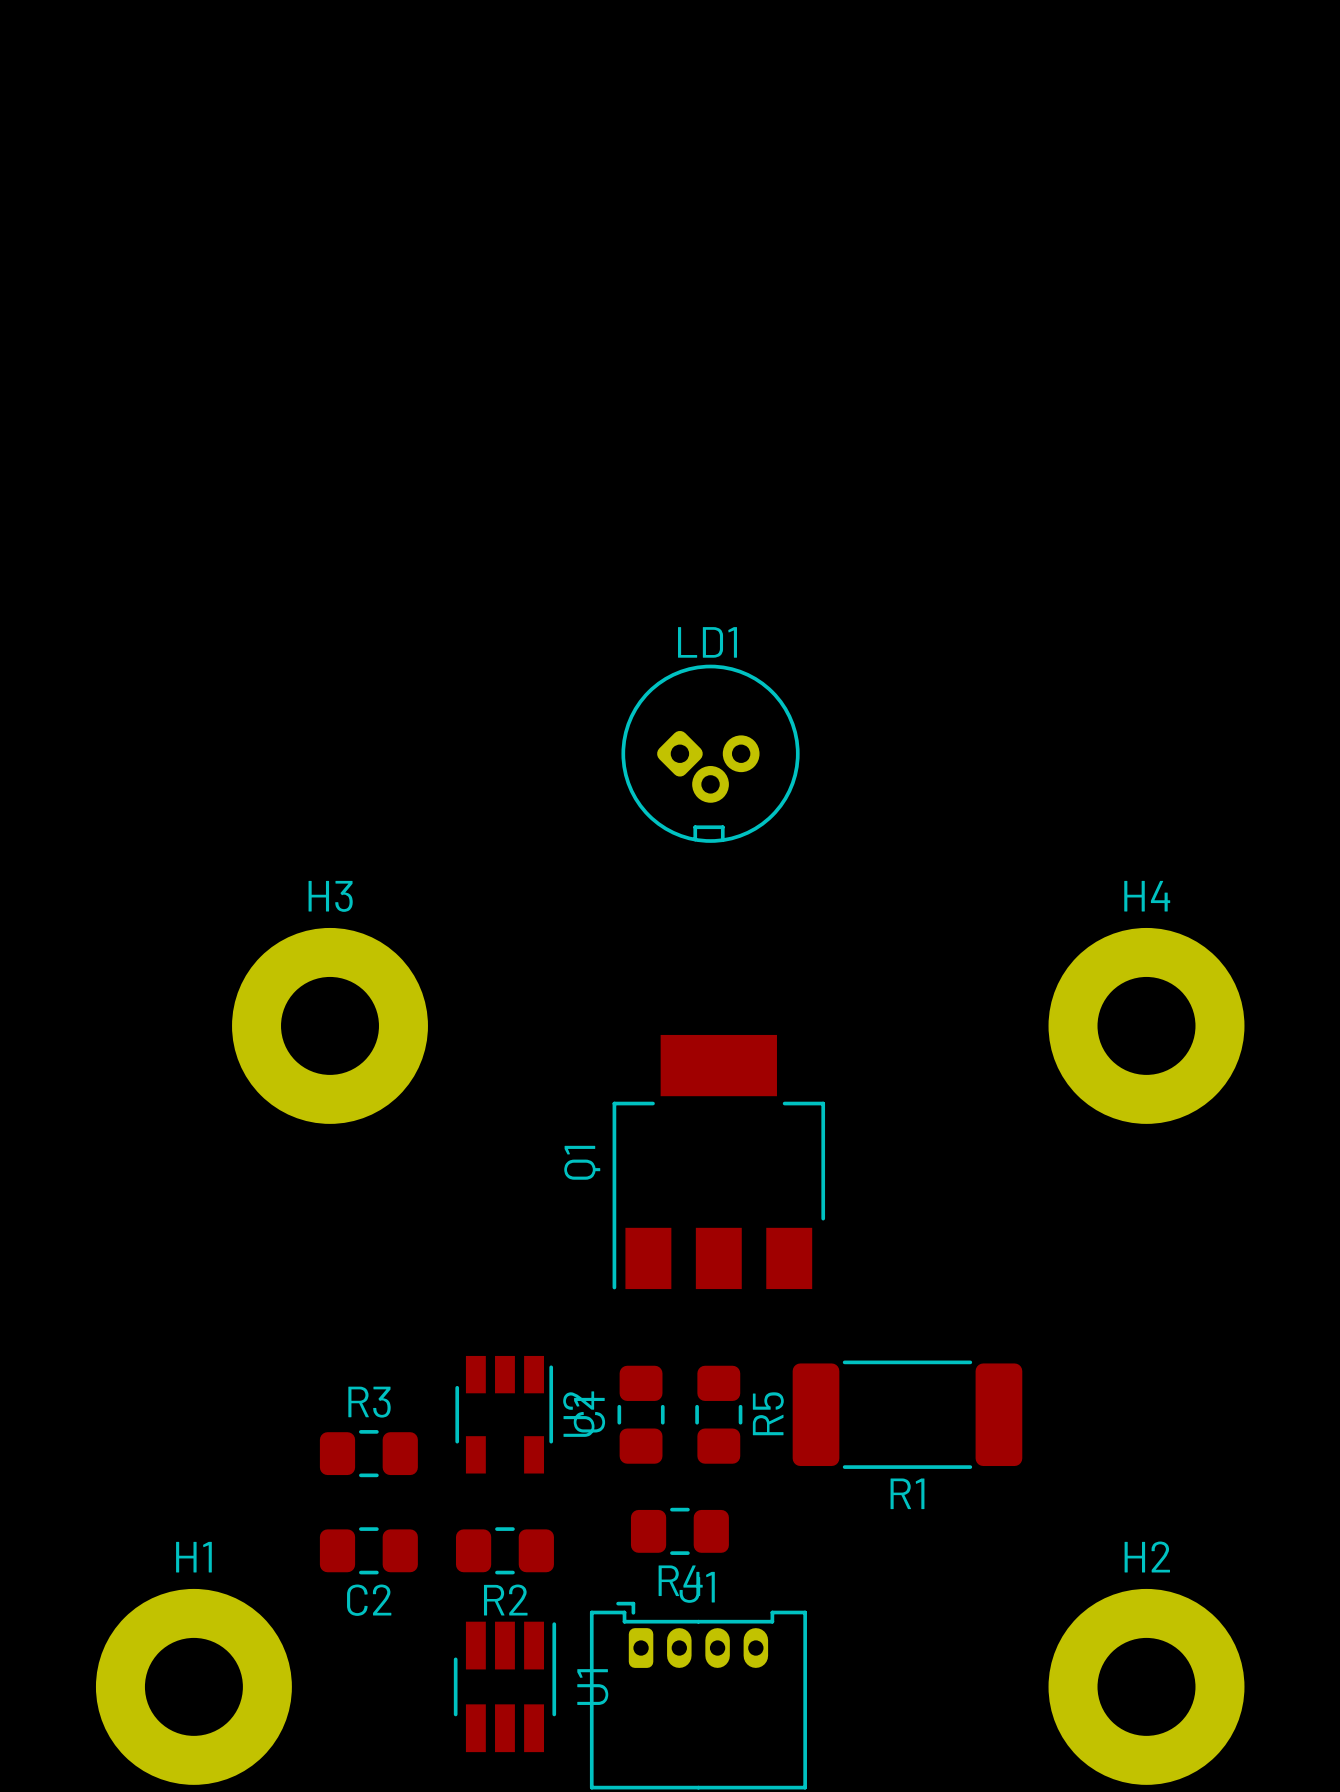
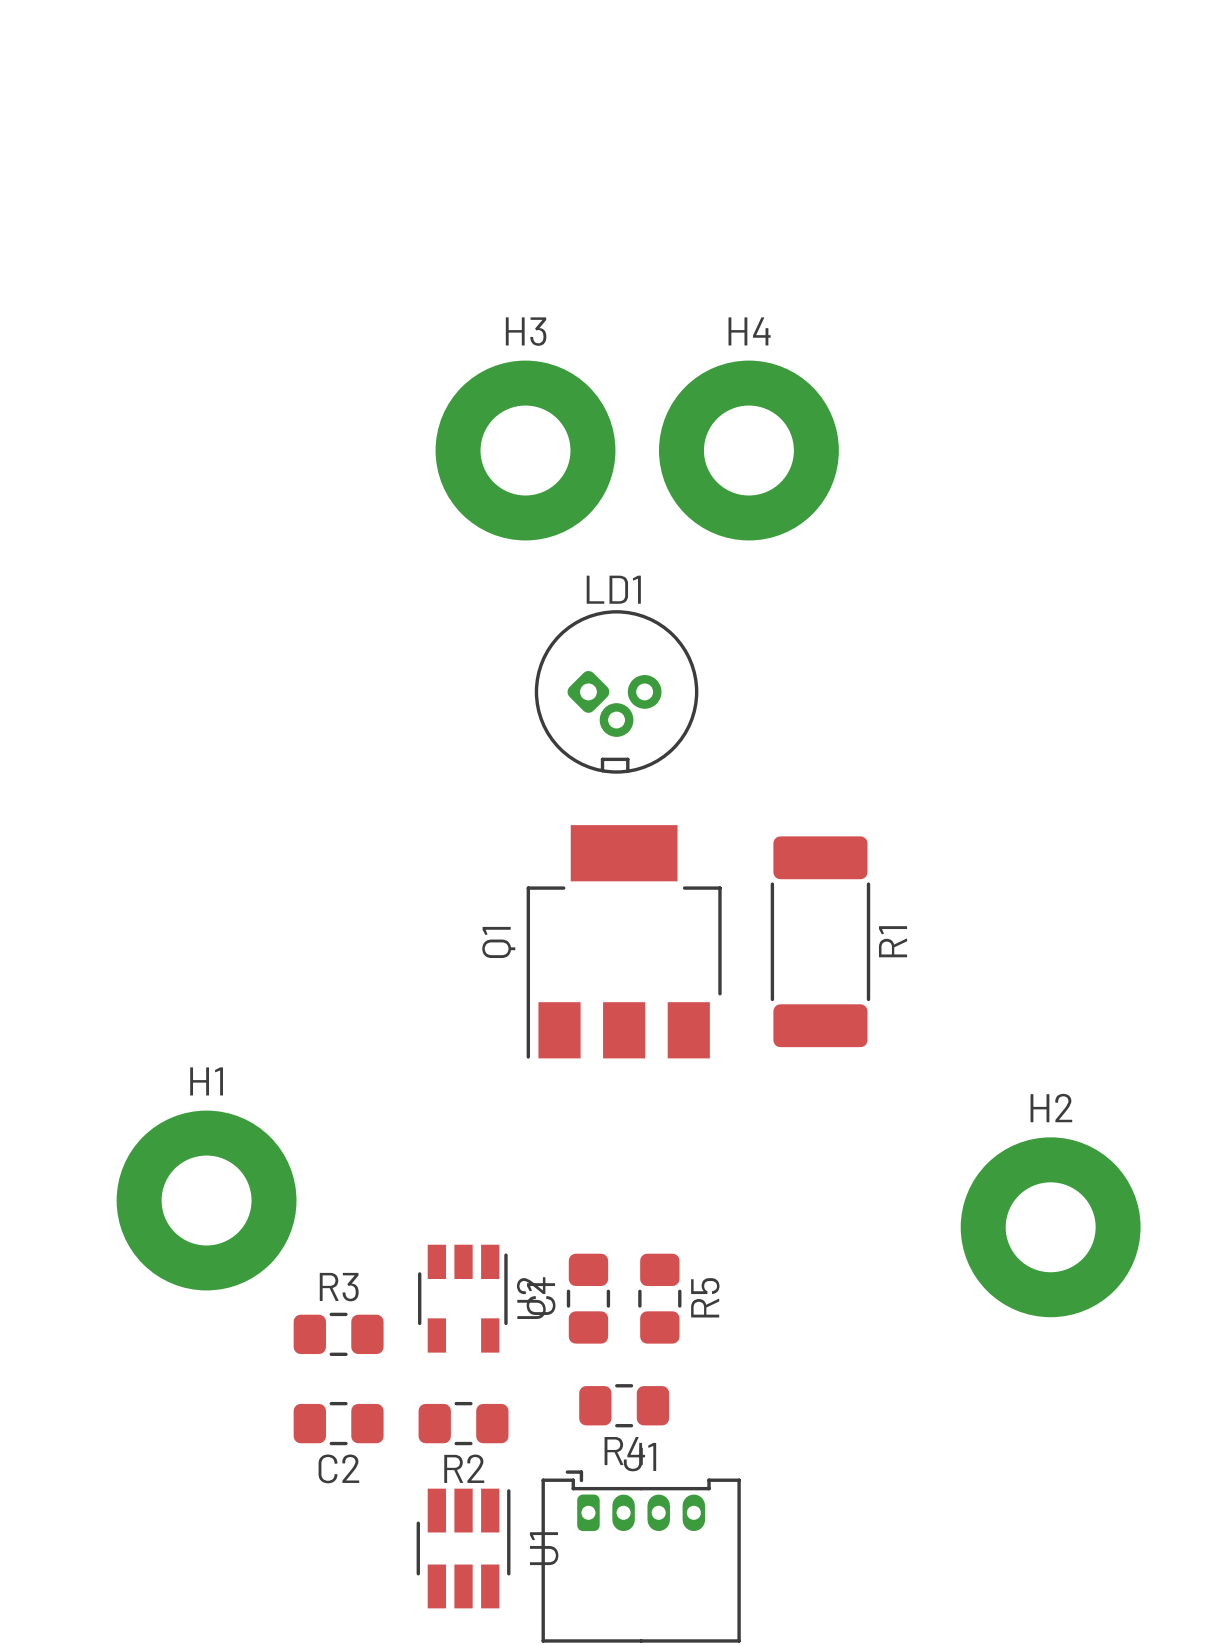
LD1 position: (710, 753) -> (616, 691)
H3 position: (330, 1025) -> (525, 450)
H4 position: (1146, 1025) -> (748, 450)
Q1 position: (718, 1162) -> (624, 941)
R1 rotation: 0° (907, 1414) -> 90° clockwise (820, 941)
R1 position: (907, 1414) -> (820, 941)
R1 name position: R1 (907, 1493) -> R1 (893, 941)
H1 position: (193, 1686) -> (206, 1200)
H2 position: (1146, 1686) -> (1050, 1227)

